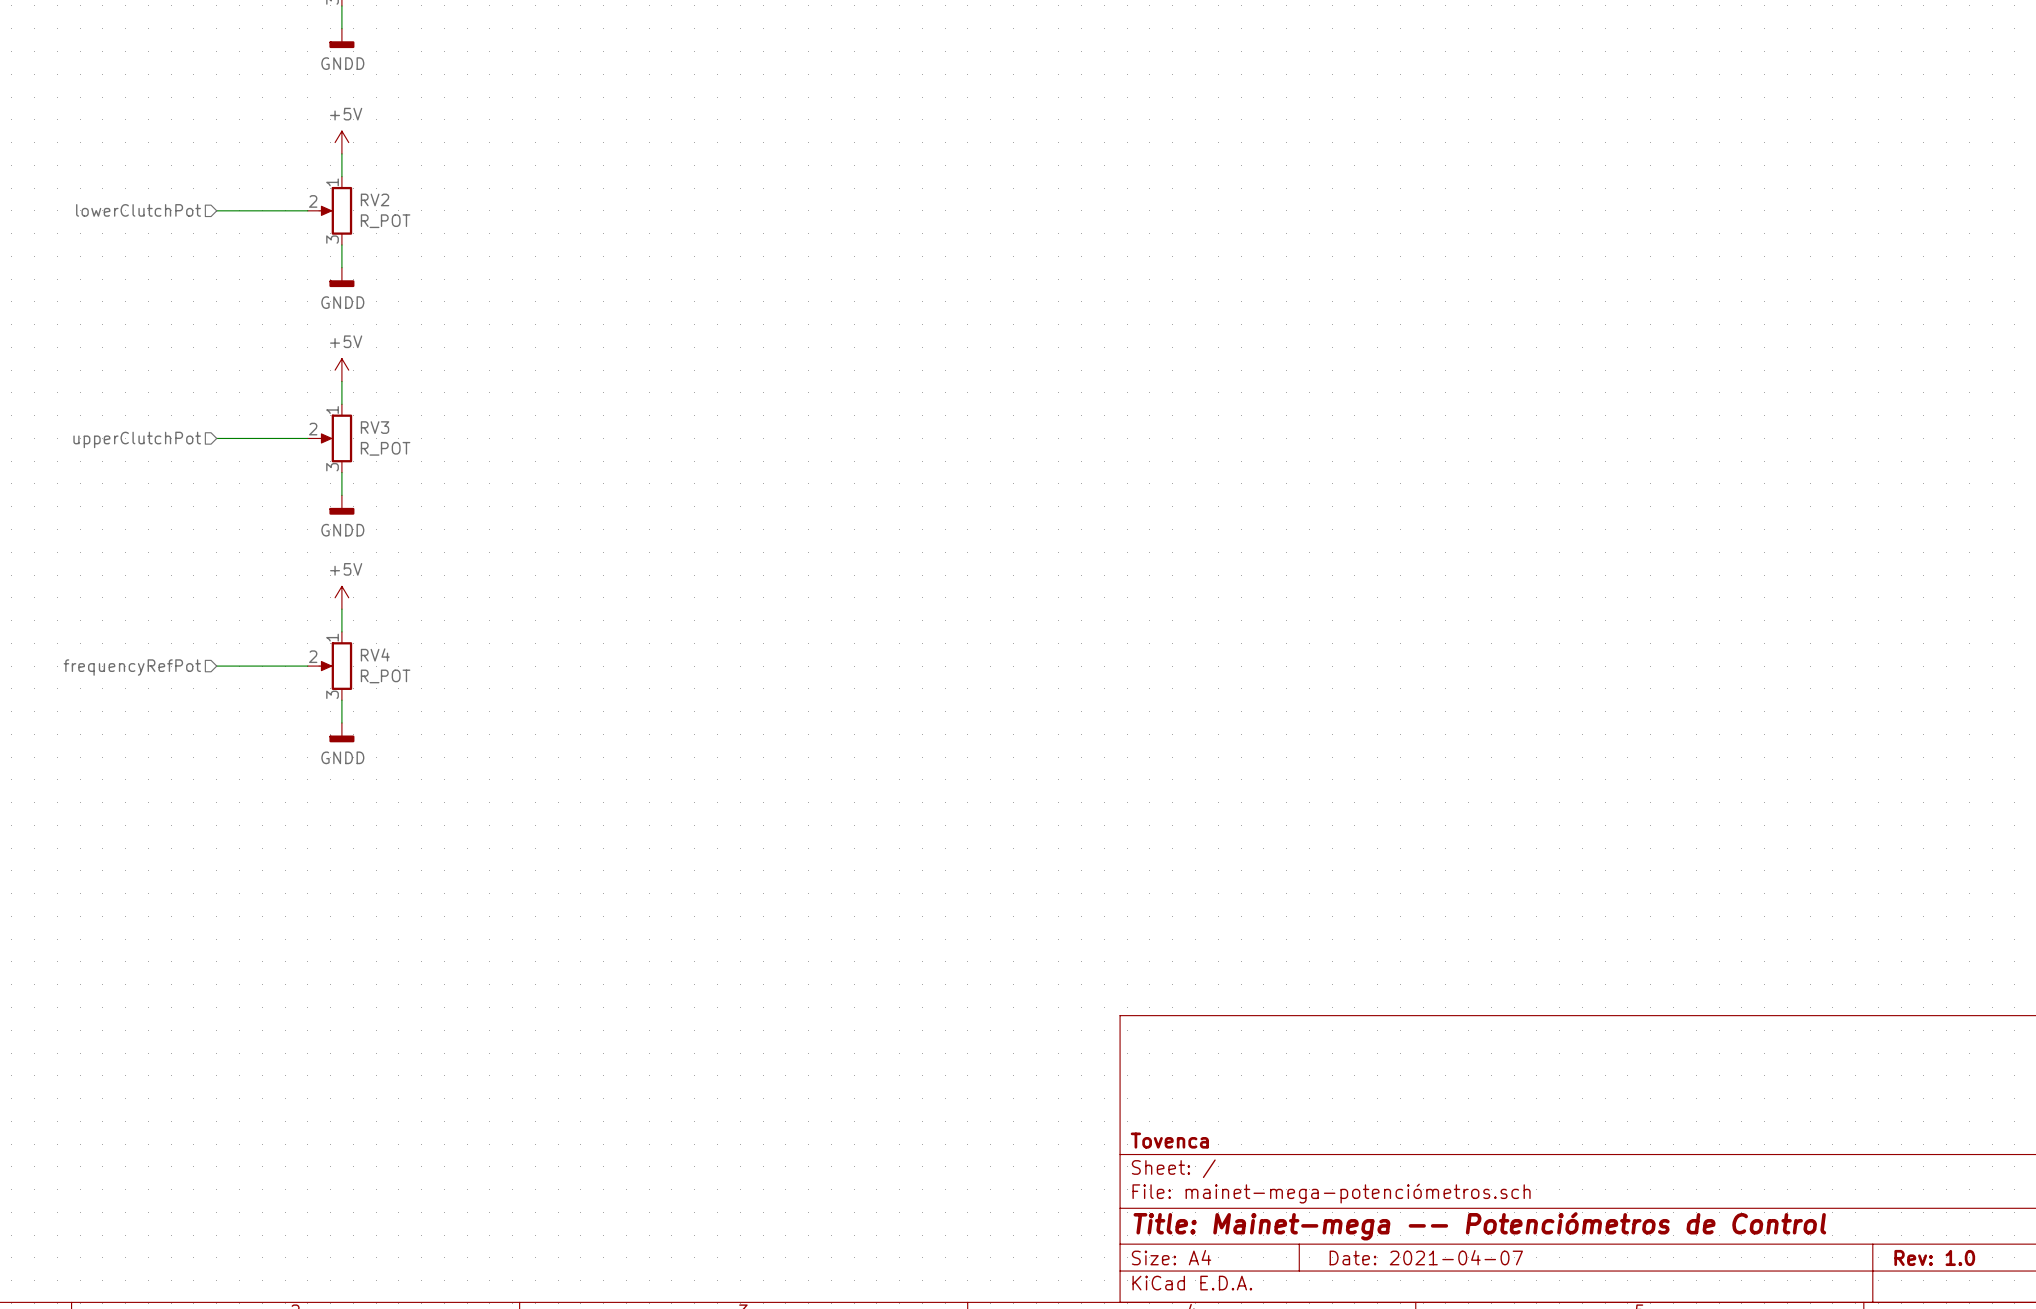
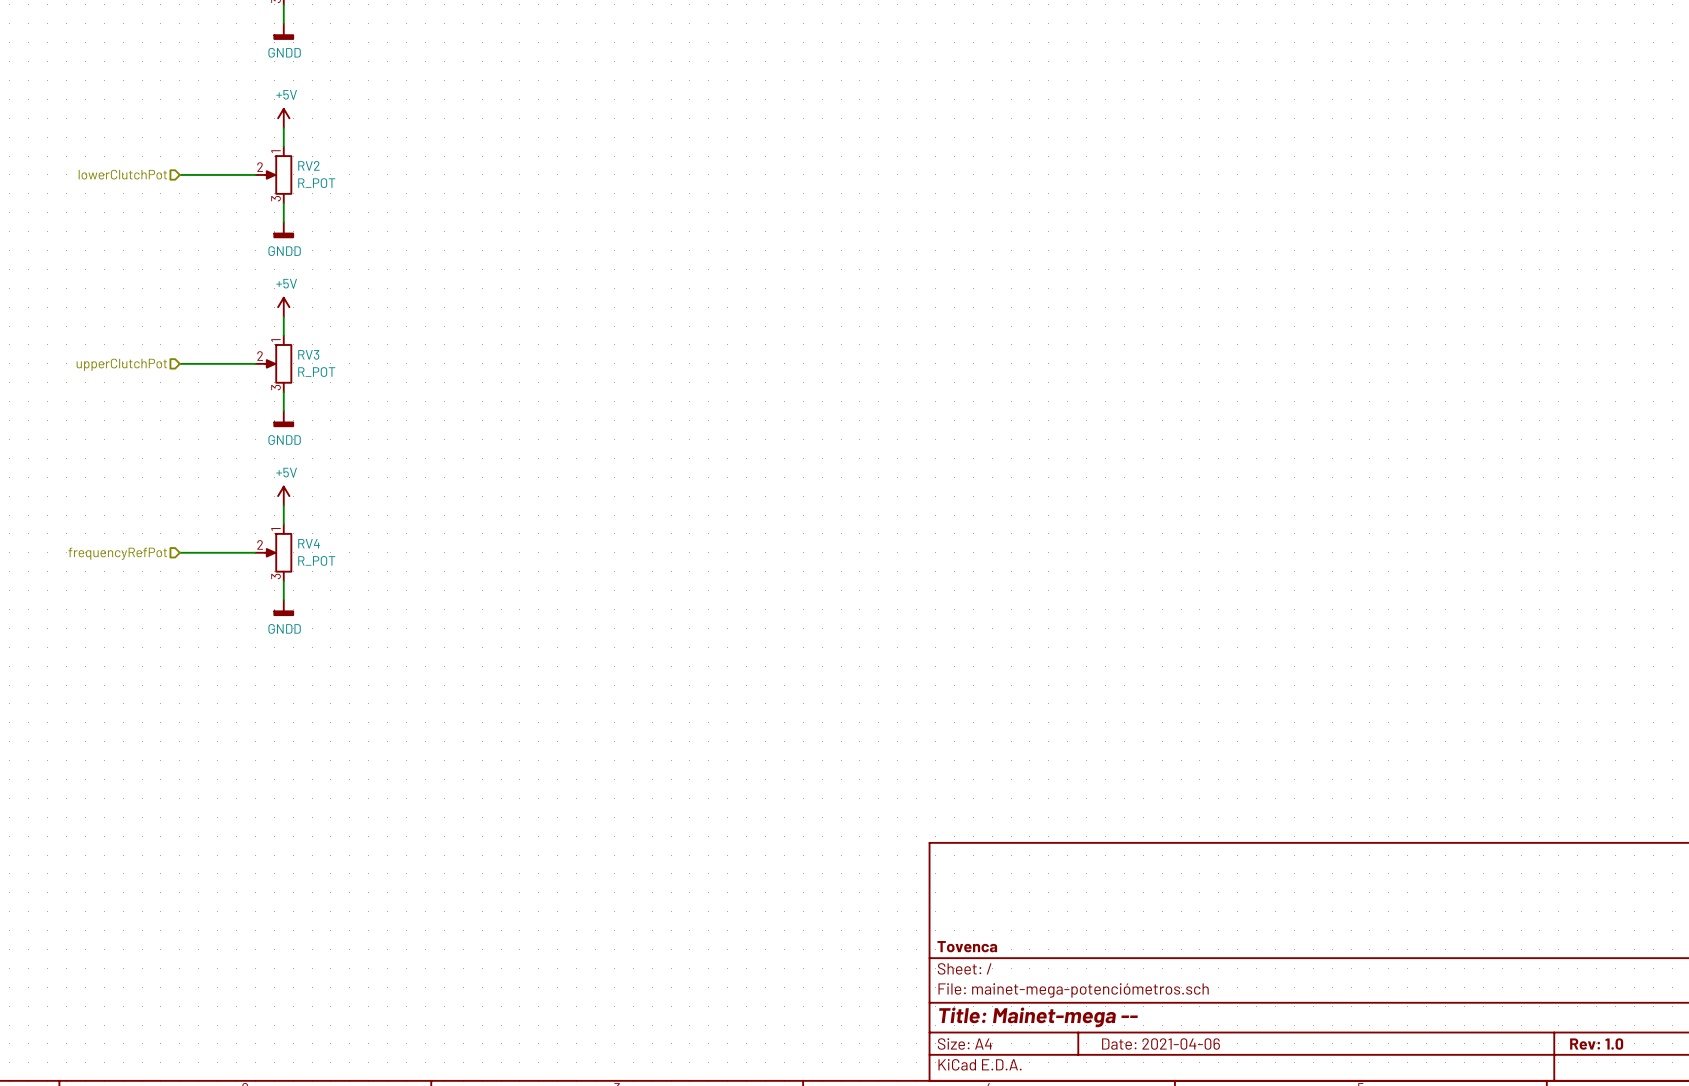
title block: Title: Mainet-mega -- Potenciómetros de Control (1479, 1226) -> Title: Mainet-mega -- (1038, 1017)
title block: Date: 2021-04-07 (1426, 1257) -> Date: 2021-04-06 (1161, 1044)

